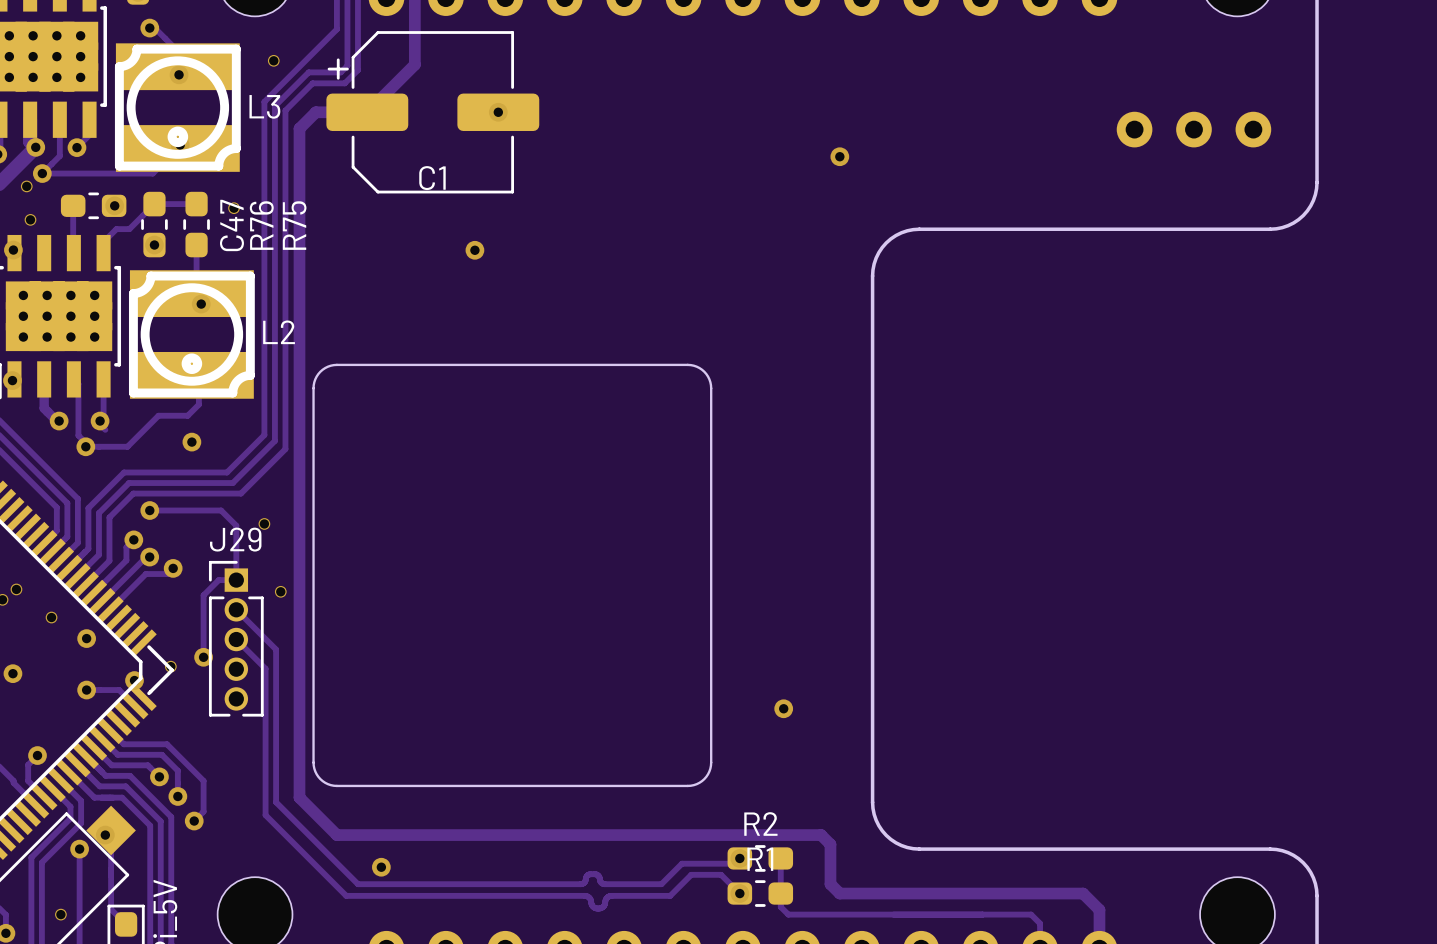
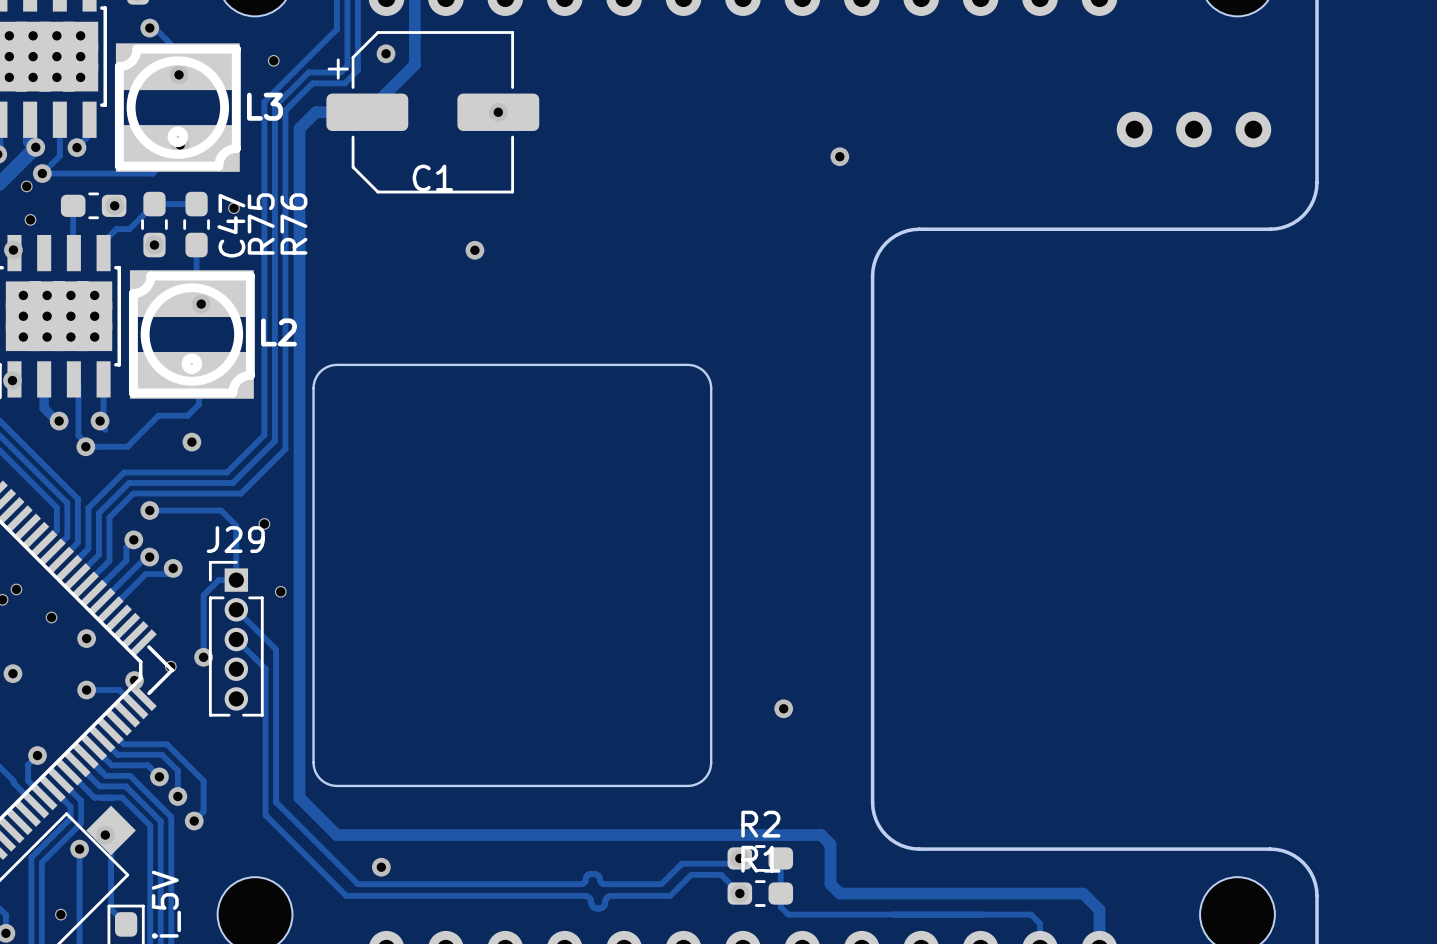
via: none -> (386, 53)
R76 name position: R76 (261, 225) -> R76 (293, 223)
R75 name position: R75 (294, 225) -> R75 (261, 223)

